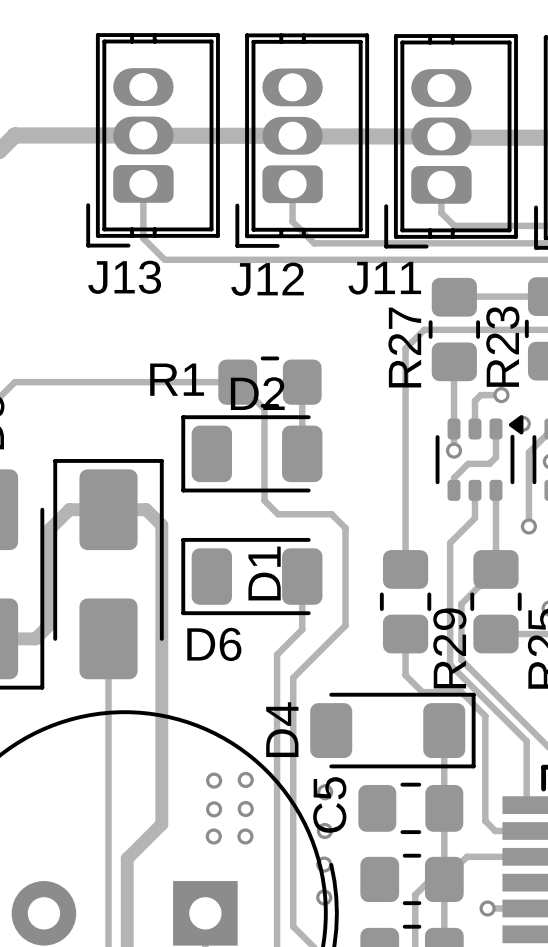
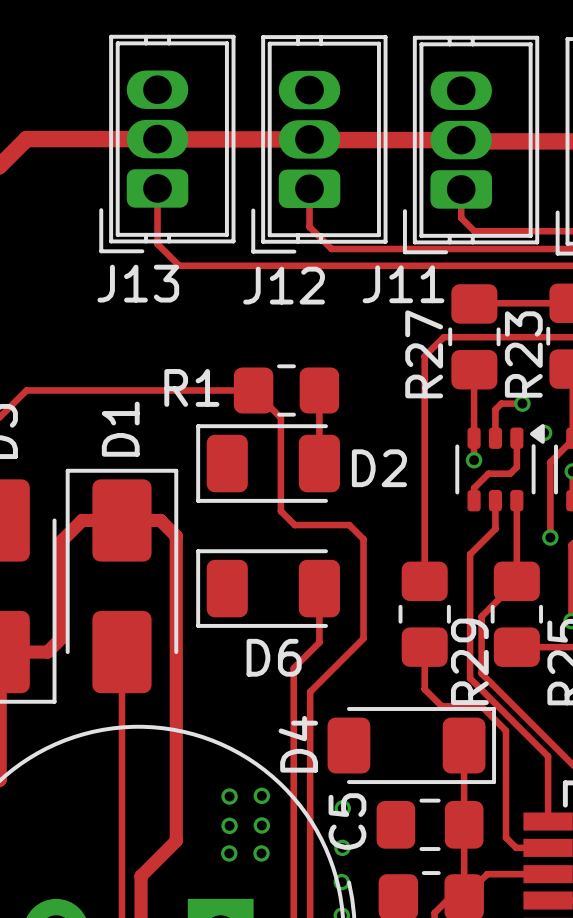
D2 name position: D2 (257, 393) -> D2 (379, 468)
D1 name position: D1 (264, 573) -> D1 (120, 429)
D6 name position: D6 (214, 644) -> D6 (274, 657)

